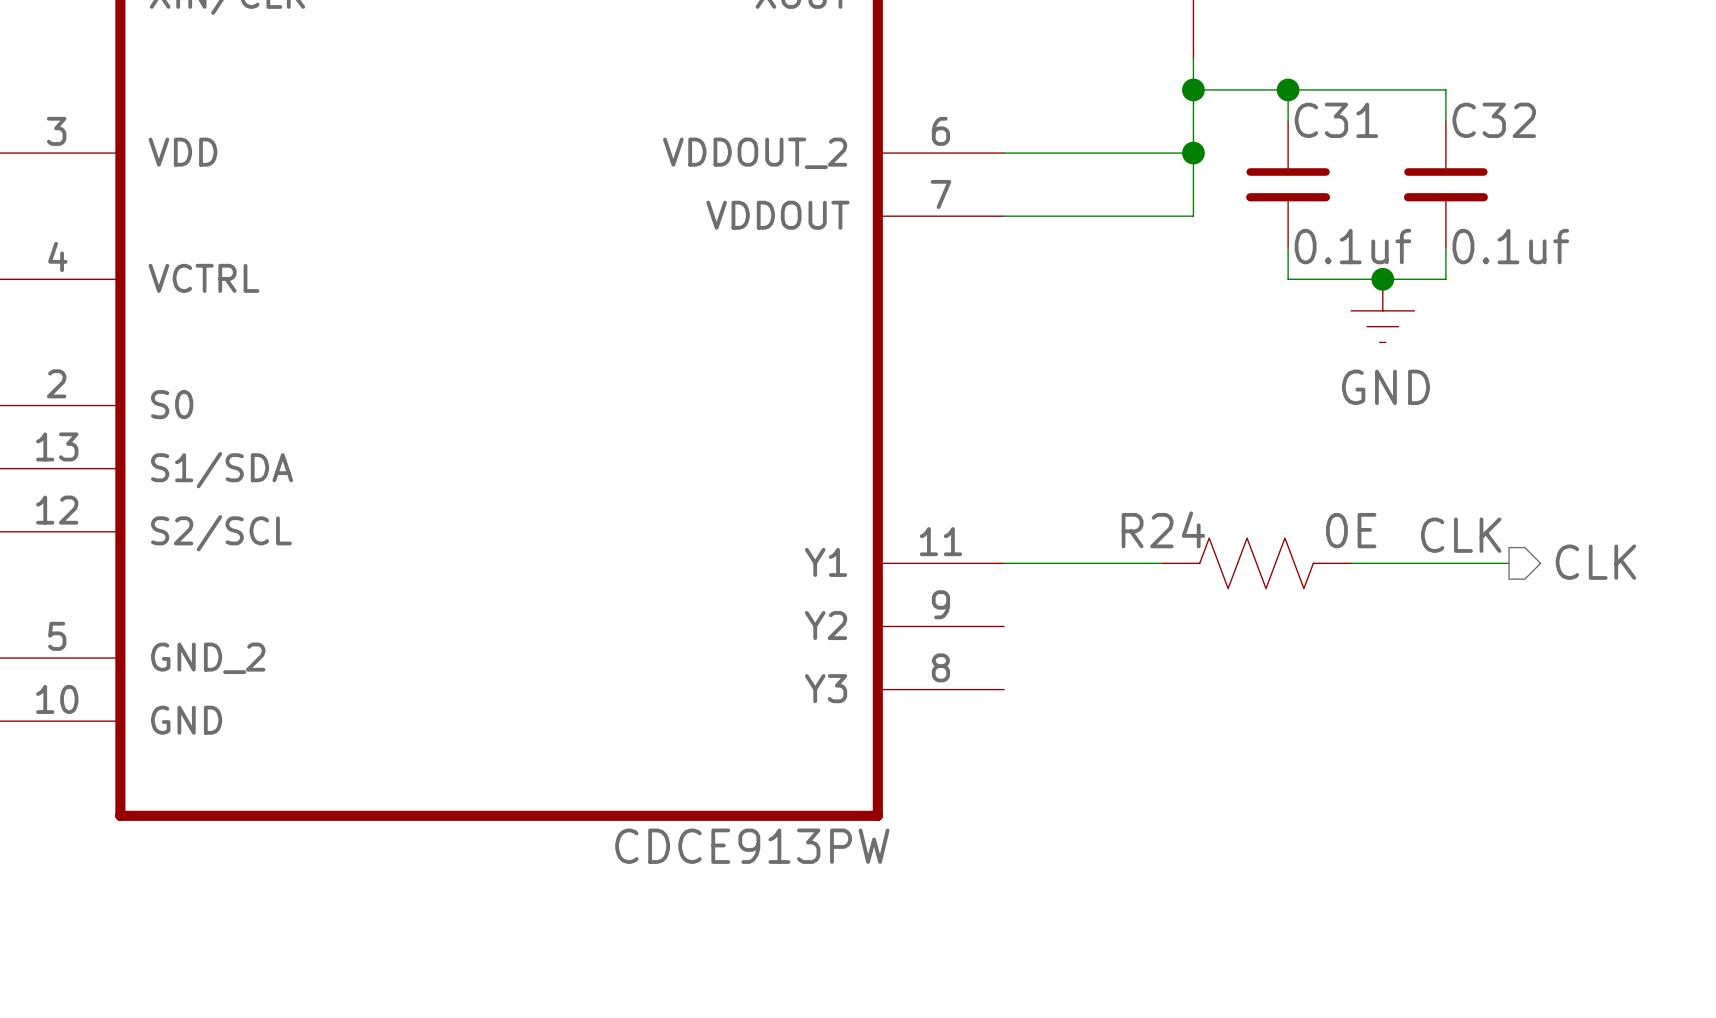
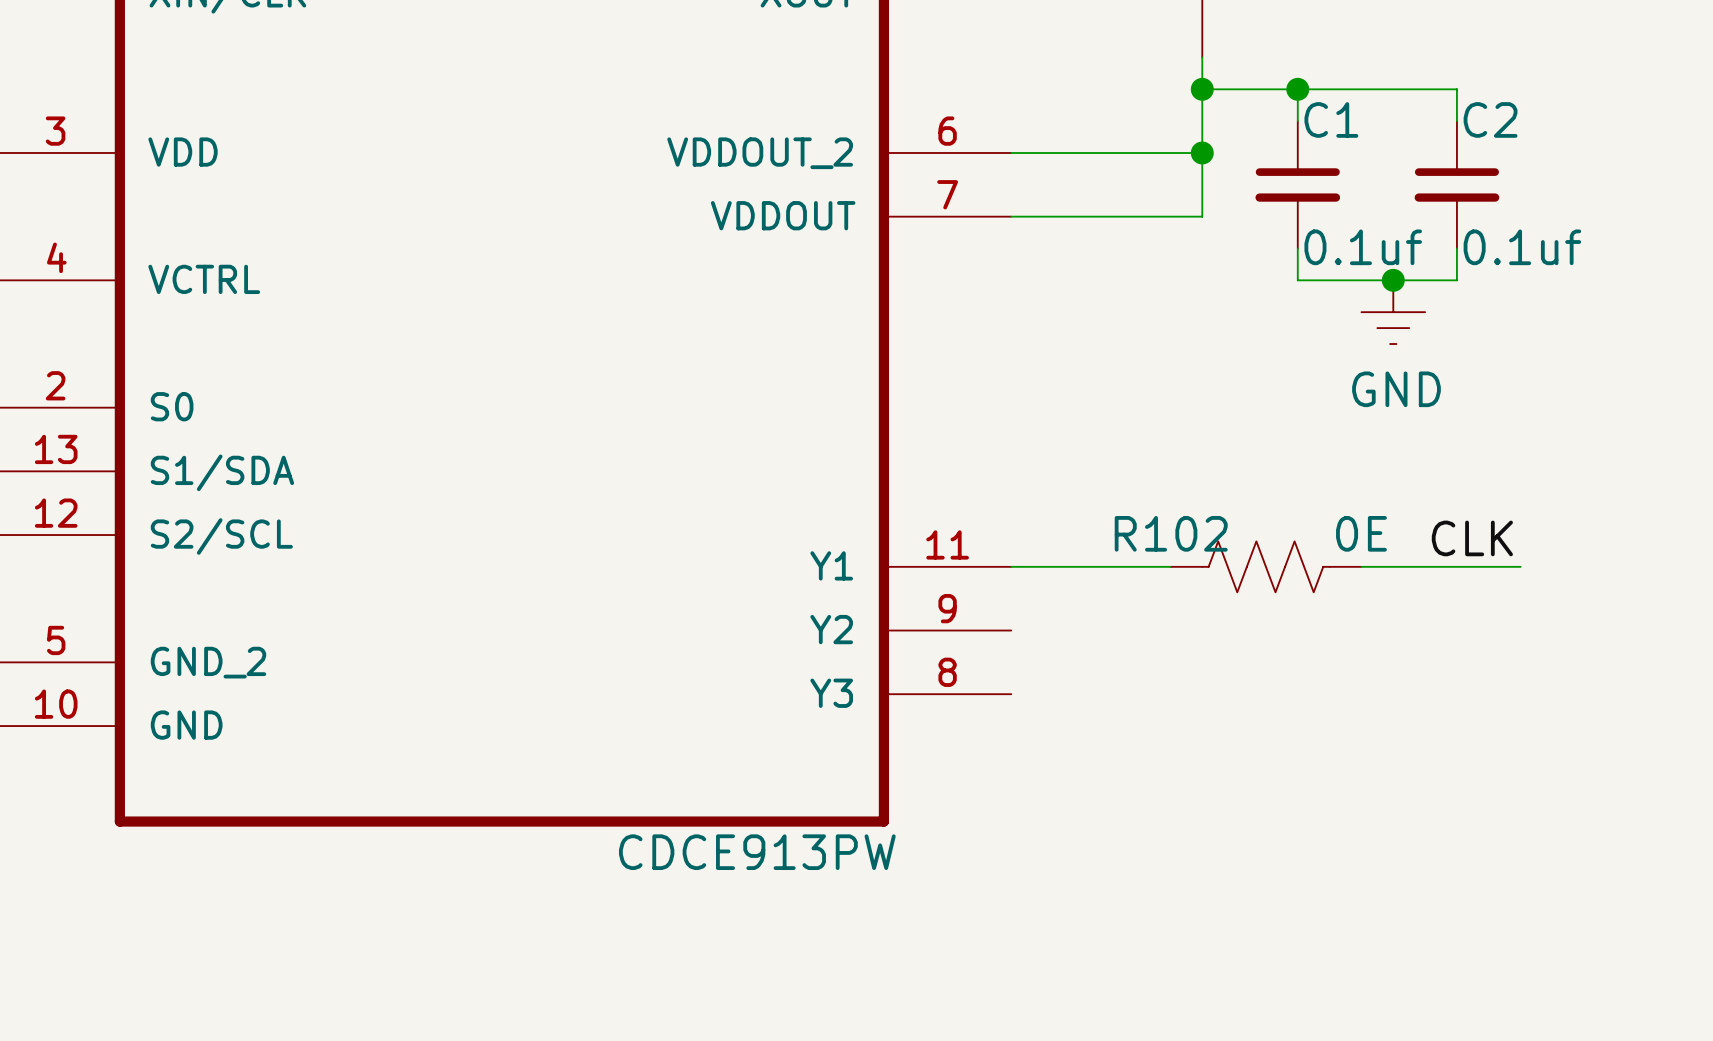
C31 name: C31 (1336, 120) -> C1 (1331, 119)
C32 name: C32 (1494, 120) -> C2 (1490, 119)
R24 name: R24 (1163, 529) -> R102 (1171, 533)
hierarchical label: CLK (1595, 562) -> none

